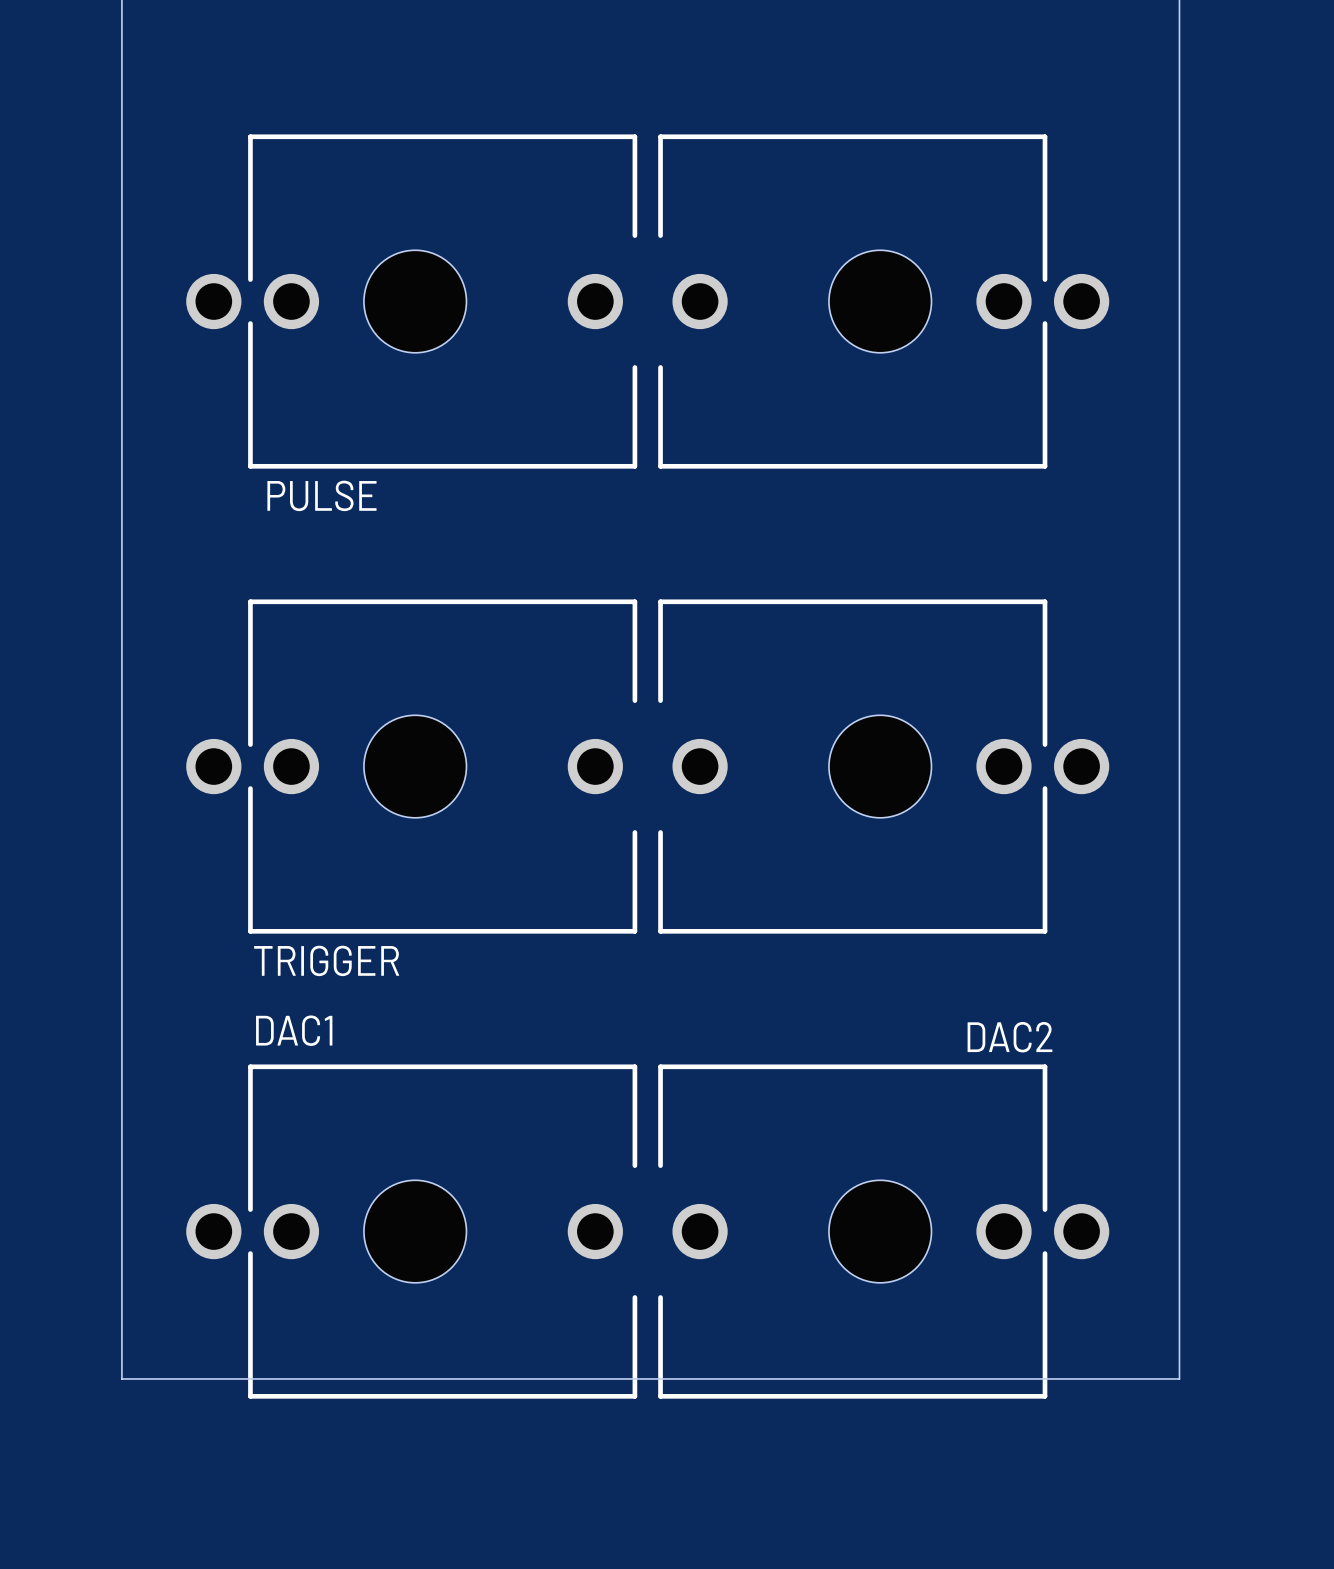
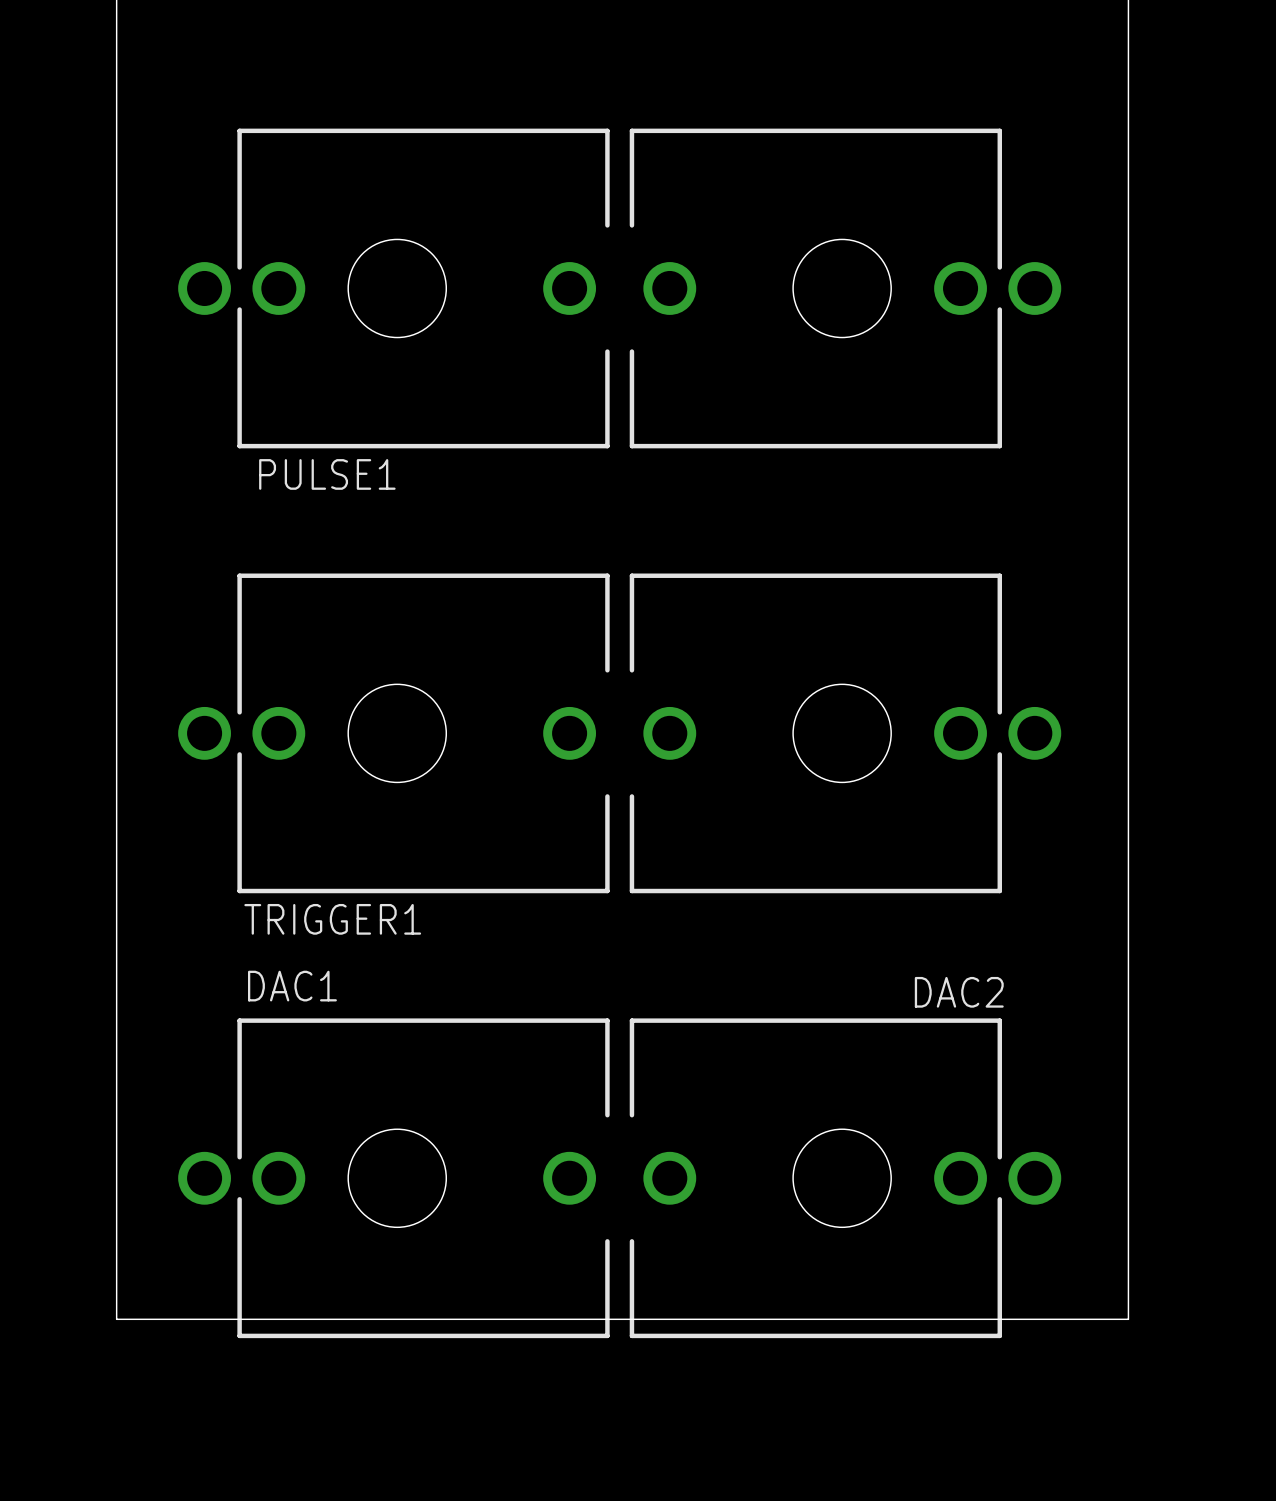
PULSE name: PULSE (321, 495) -> PULSE1 (327, 474)
TRIGGER name: TRIGGER (326, 960) -> TRIGGER1 (332, 919)

